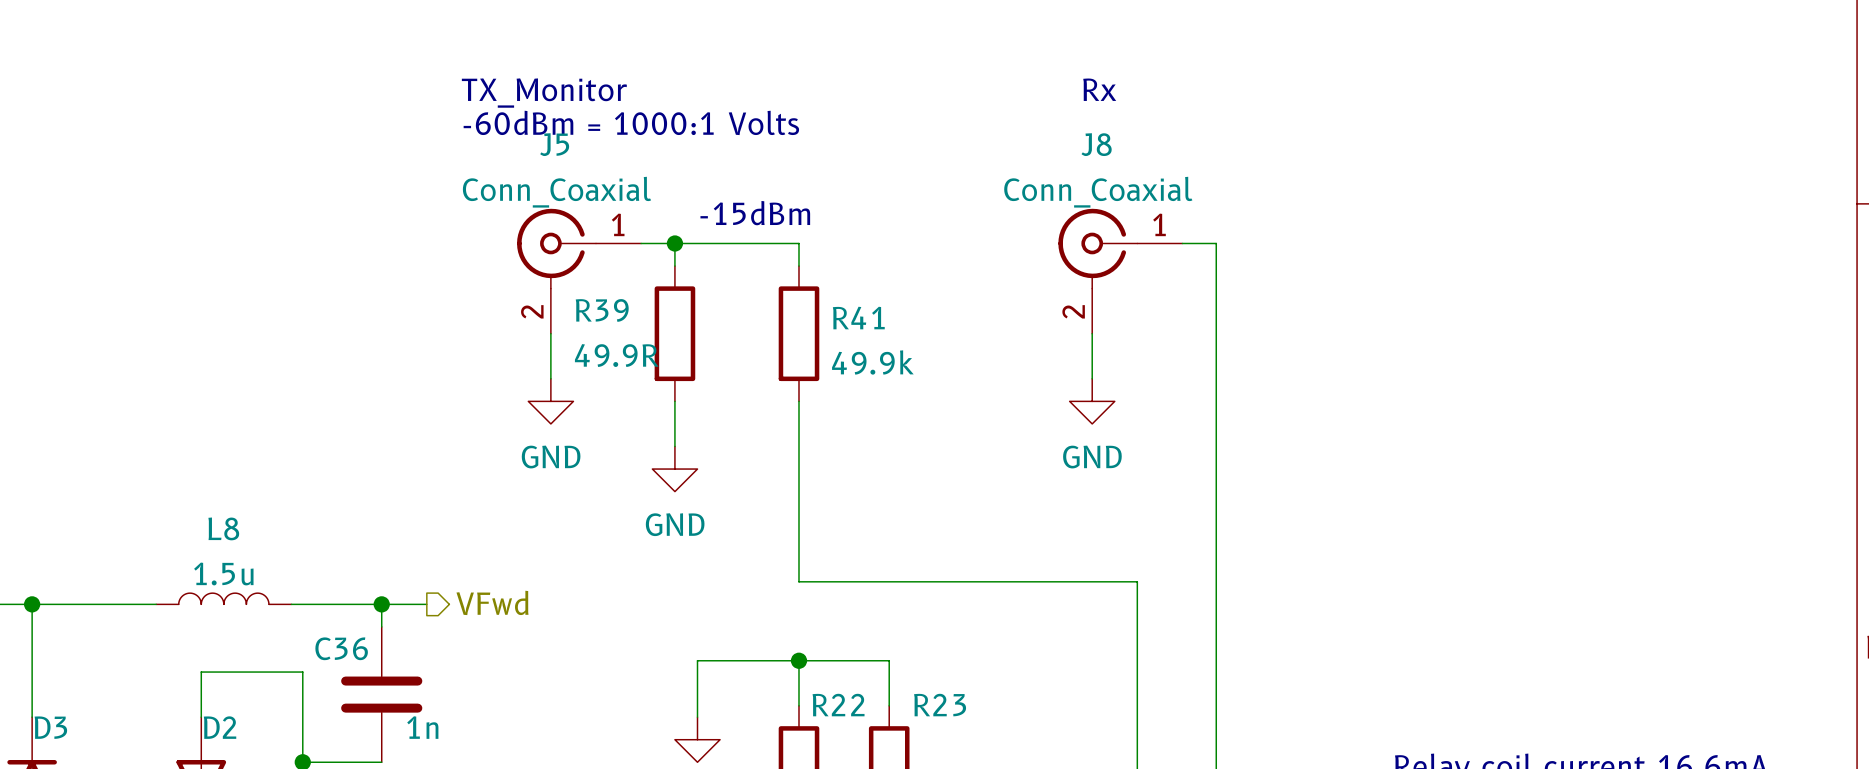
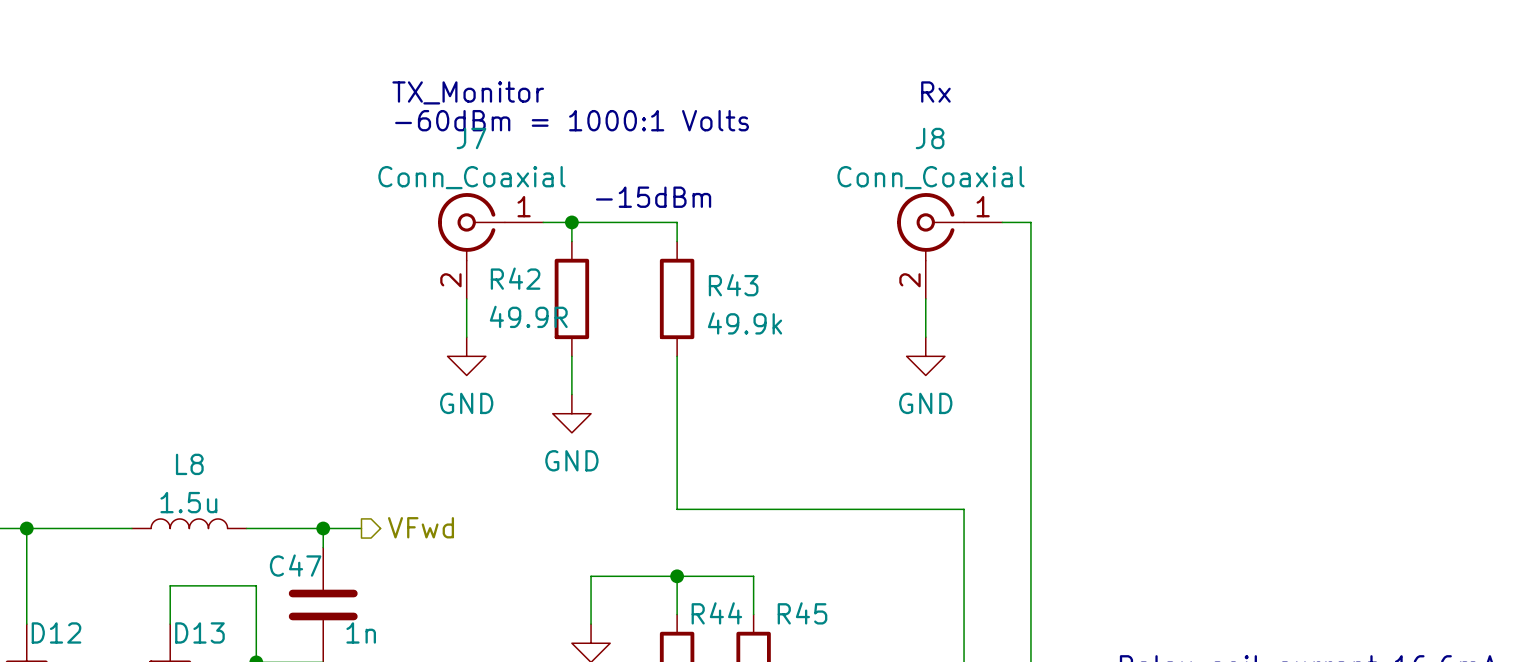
J5 name: J5 (554, 144) -> J7 (471, 138)
R39 name: R39 (602, 310) -> R42 (515, 278)
R41 name: R41 (858, 318) -> R43 (733, 285)
C36 name: C36 (341, 648) -> C47 (295, 565)
R22 name: R22 (838, 705) -> R44 (716, 613)
R23 name: R23 (940, 705) -> R45 (802, 613)
D3 name: D3 (50, 727) -> D12 (56, 632)
D2 name: D2 (220, 727) -> D13 (199, 632)

